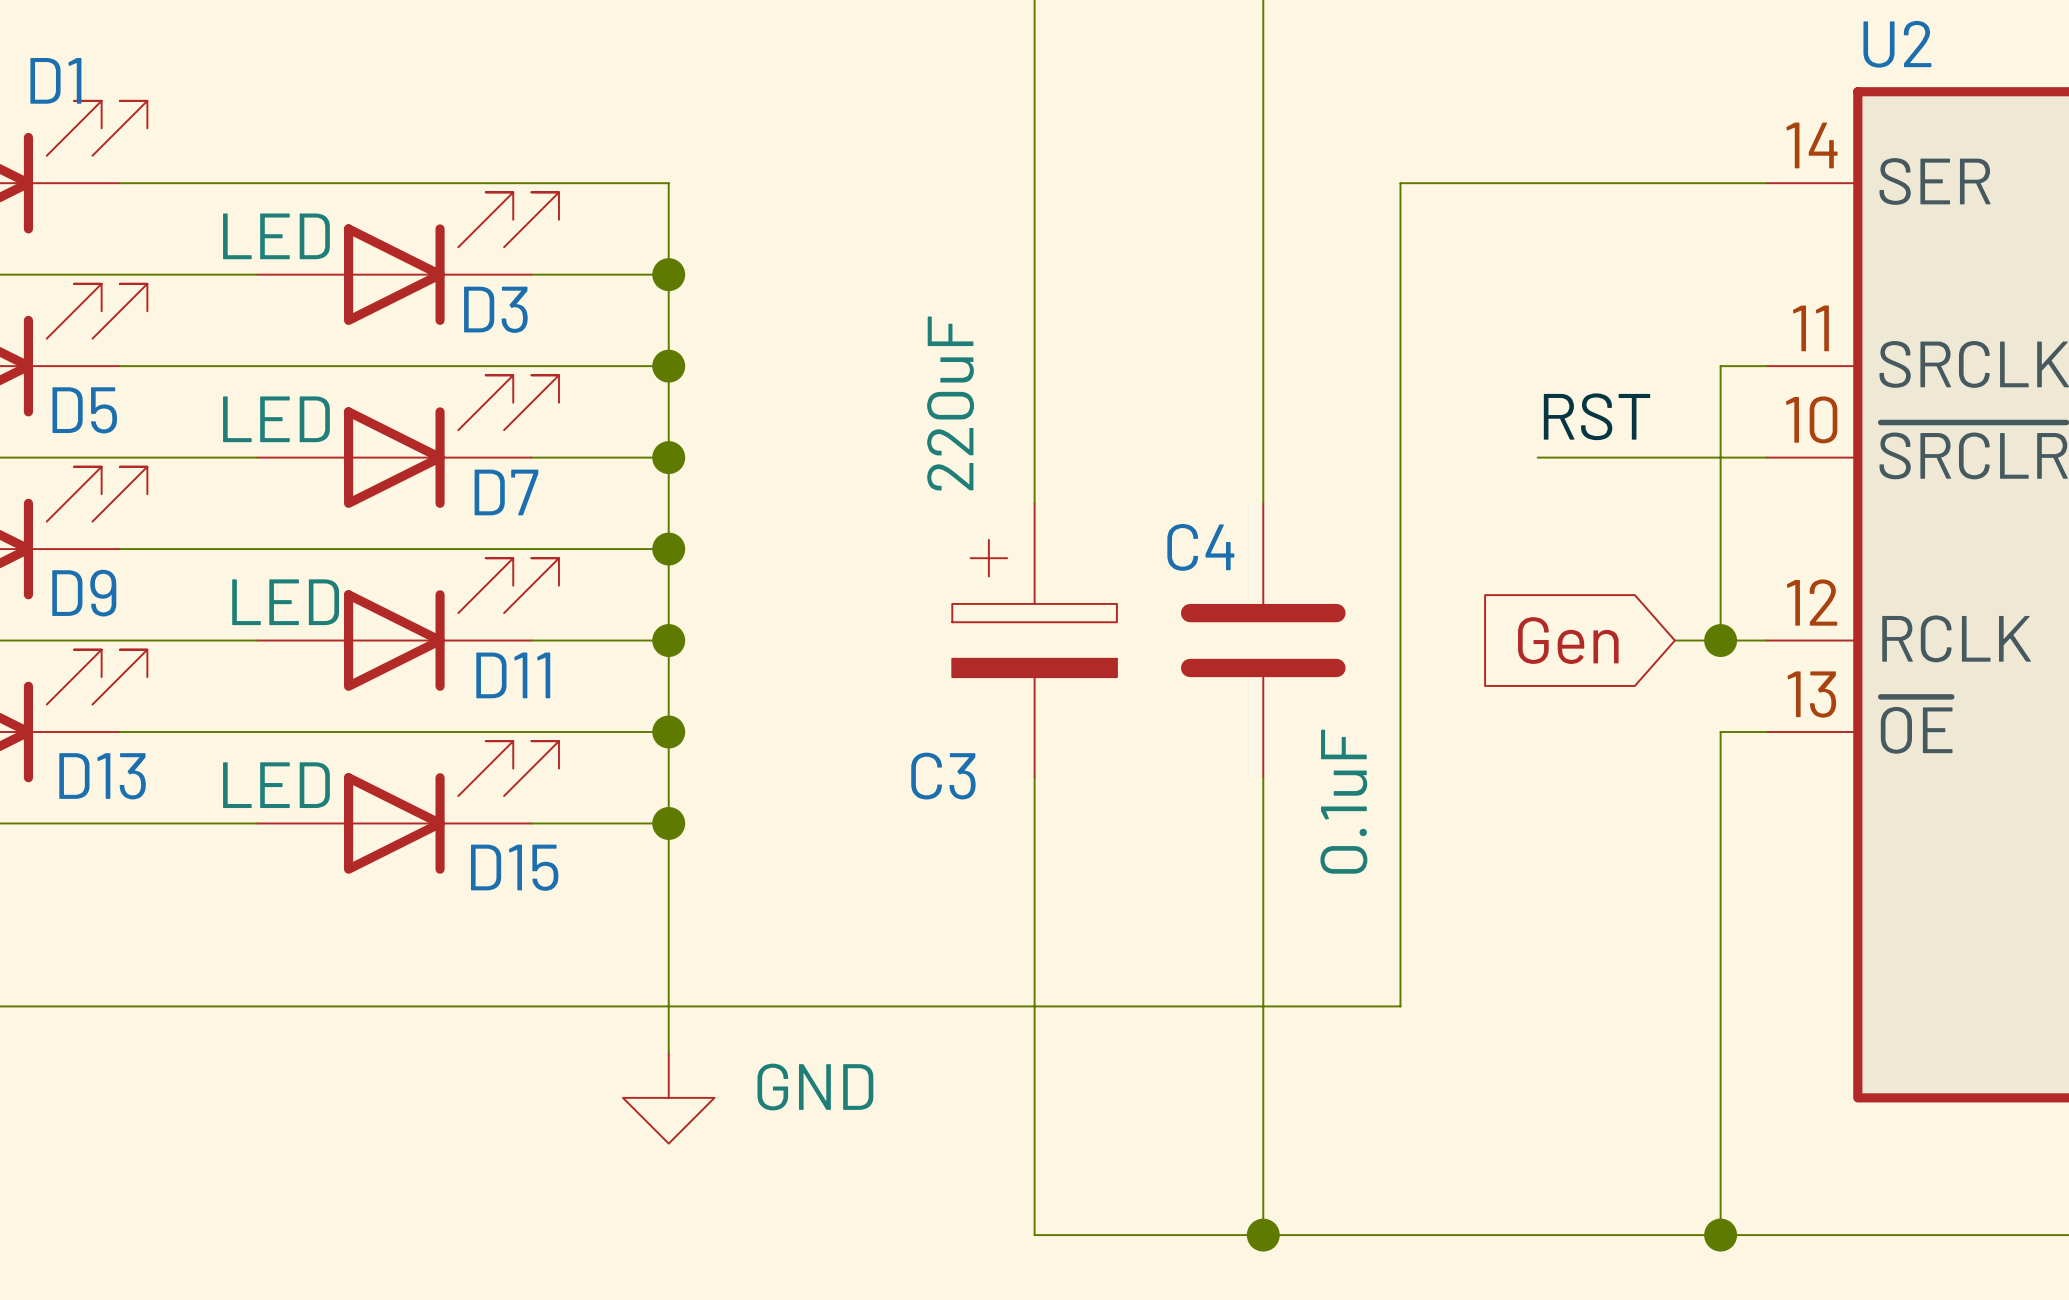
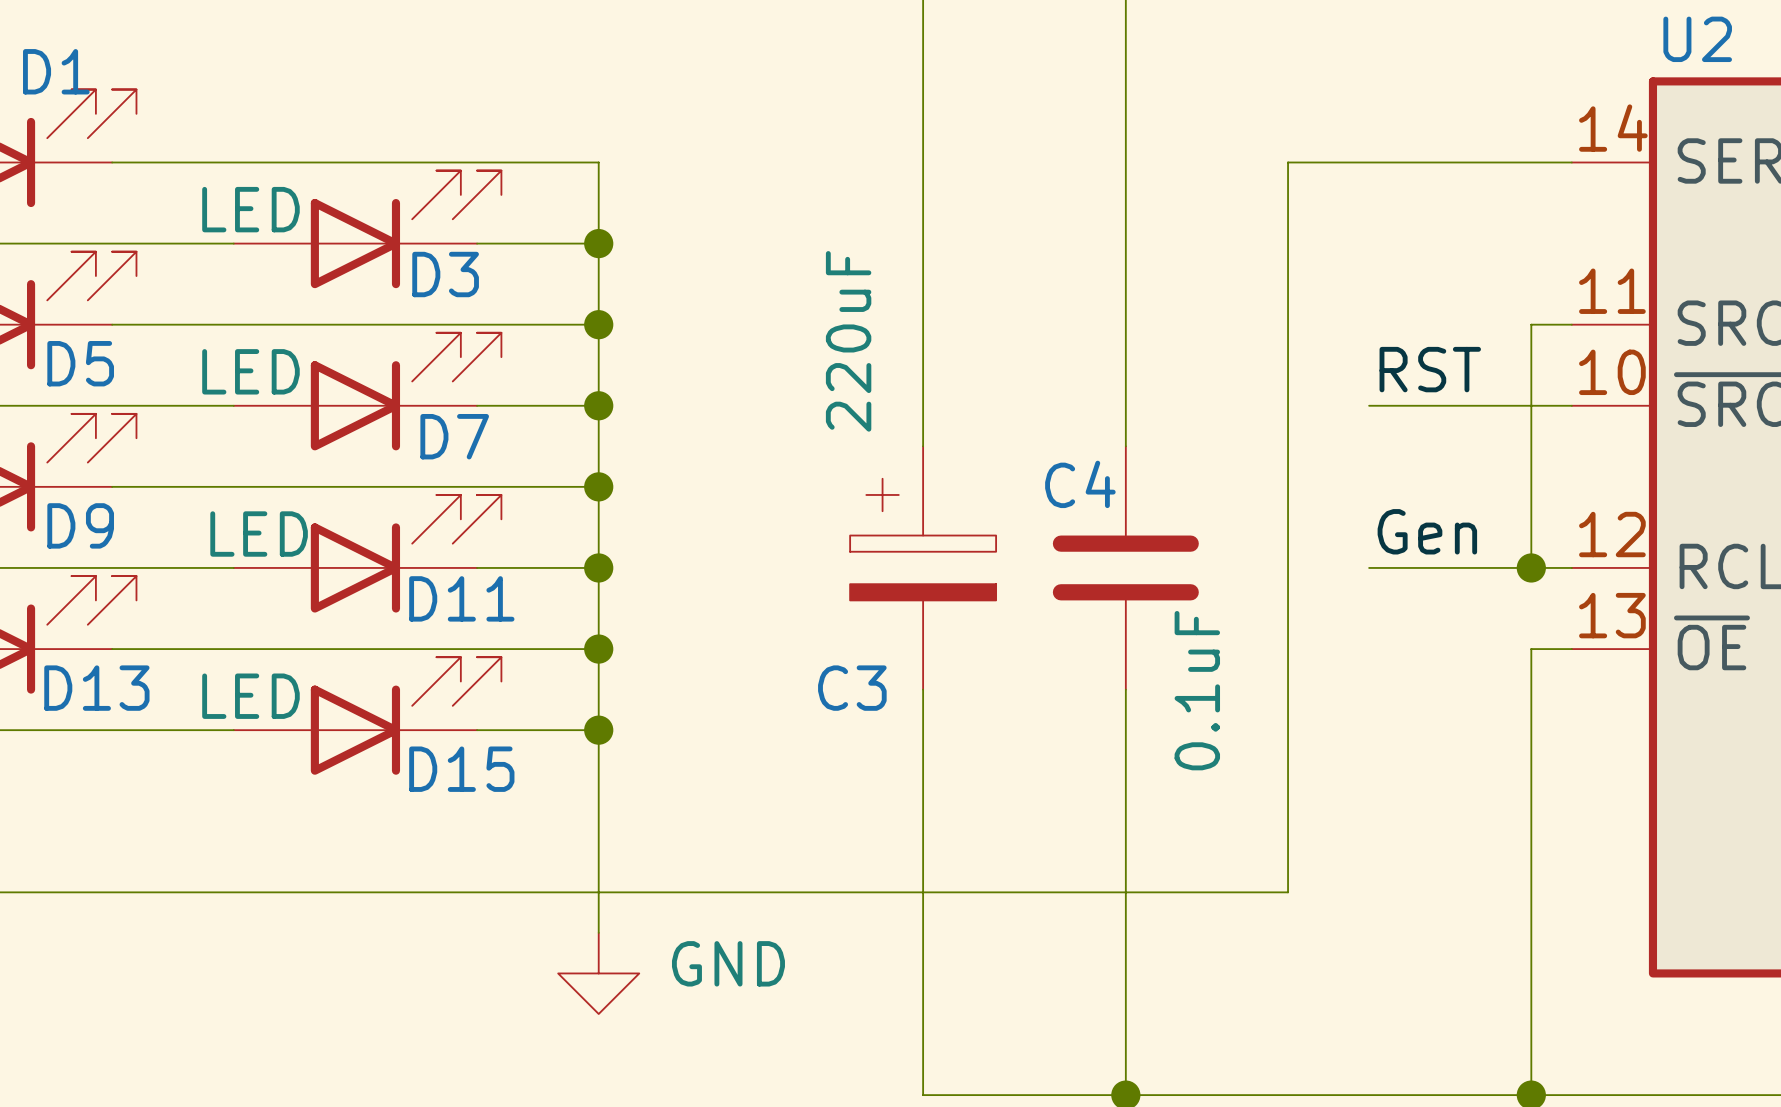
wire: (1446, 183) (1400, 183) (1400, 1006) -> (1288, 162) (1288, 892) (1247, 892)
label: none -> Gen (1427, 531)
wire: none -> (1369, 567) (1490, 567)
global label: Gen (1568, 640) -> none

